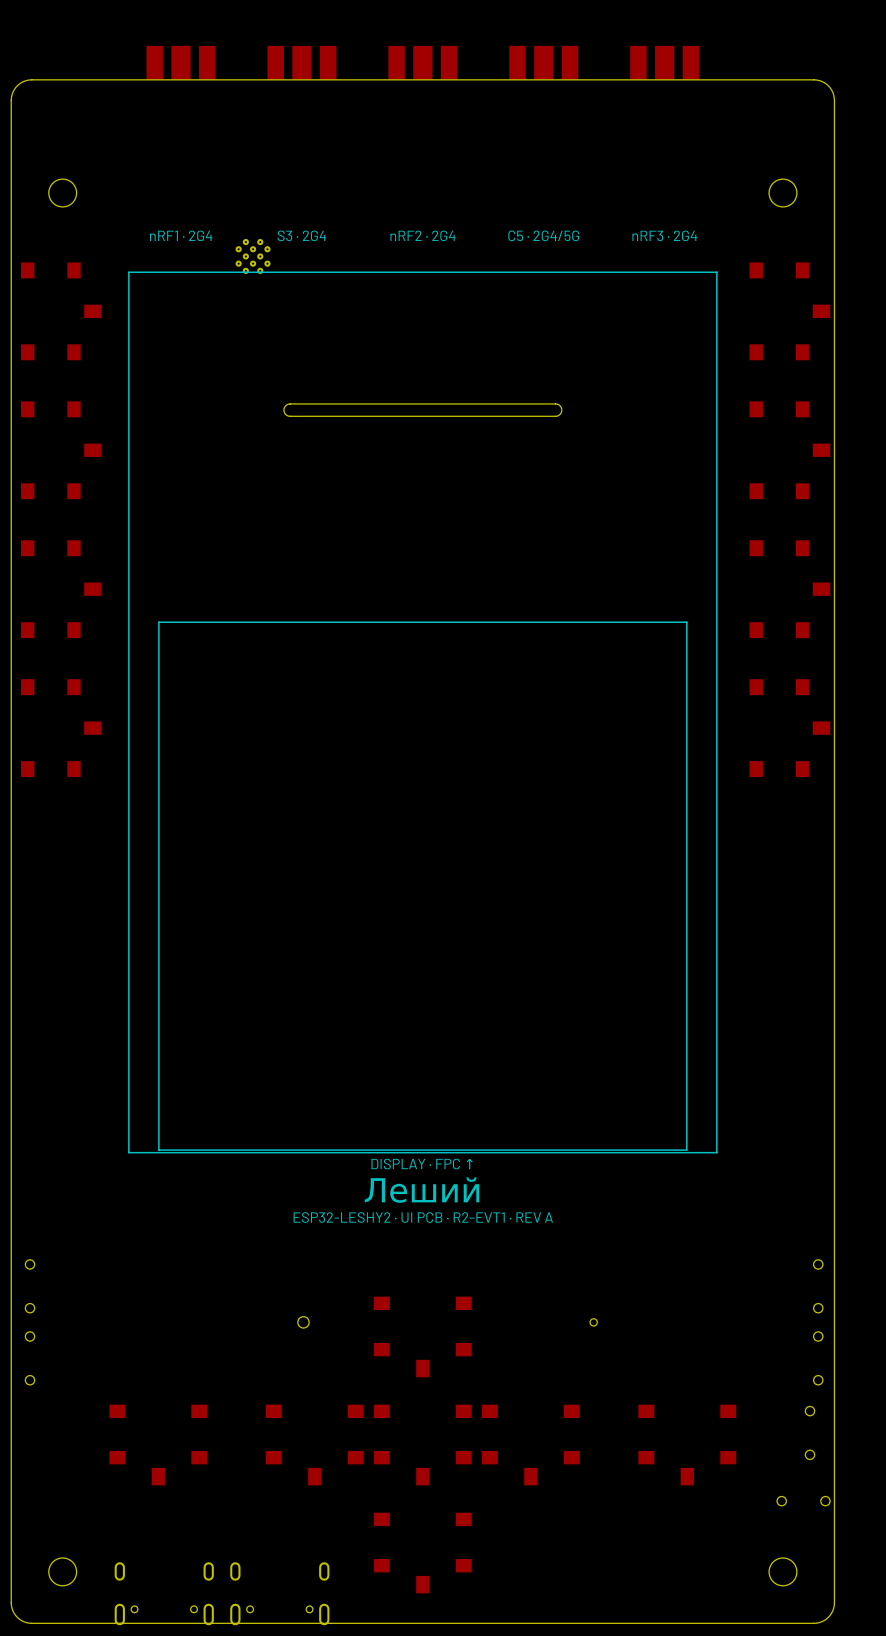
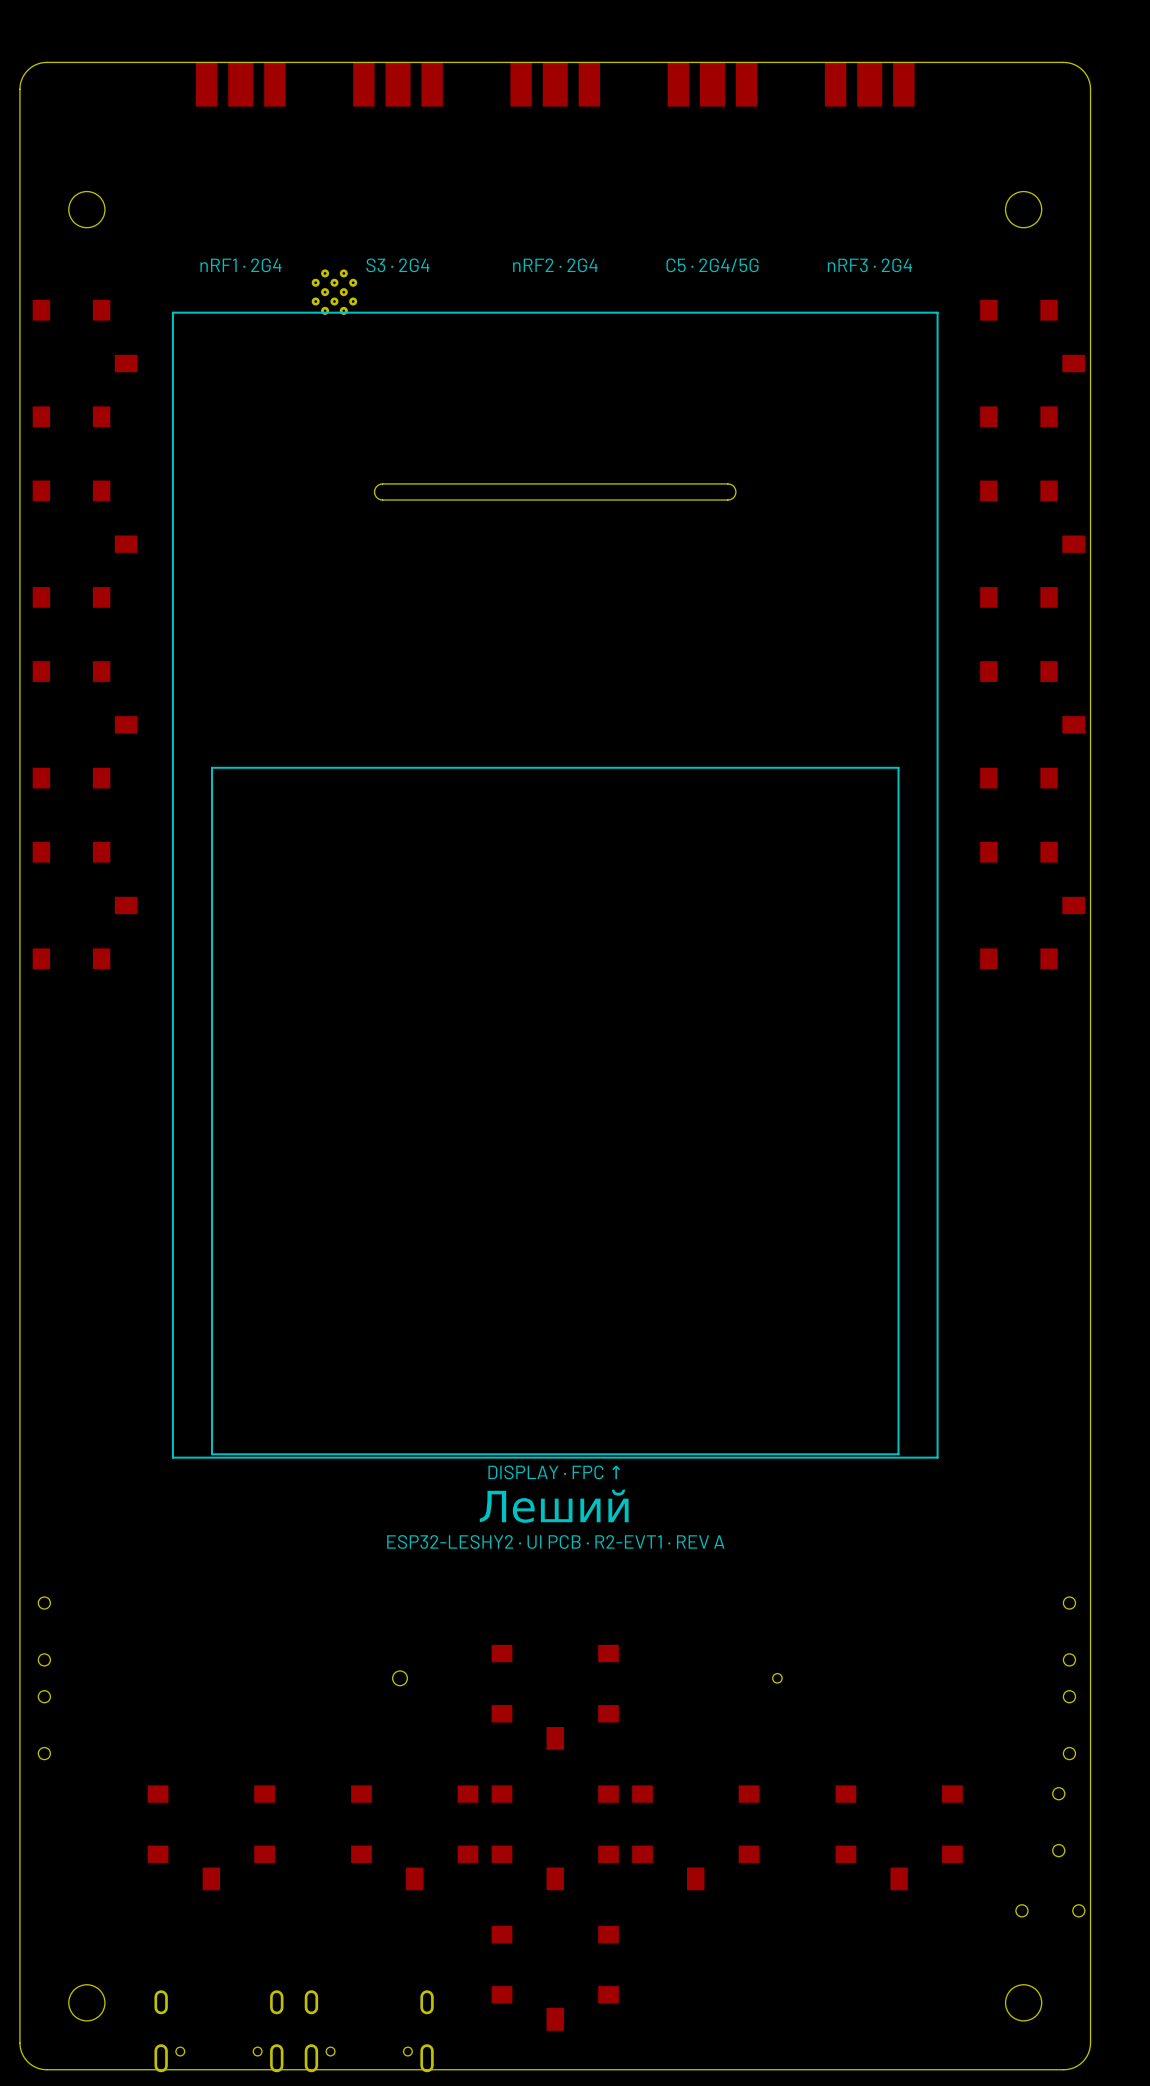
part position: (181, 62) -> (240, 84)
part position: (301, 62) -> (398, 84)
part position: (422, 62) -> (555, 84)
part position: (543, 62) -> (712, 84)
part position: (664, 62) -> (869, 84)

